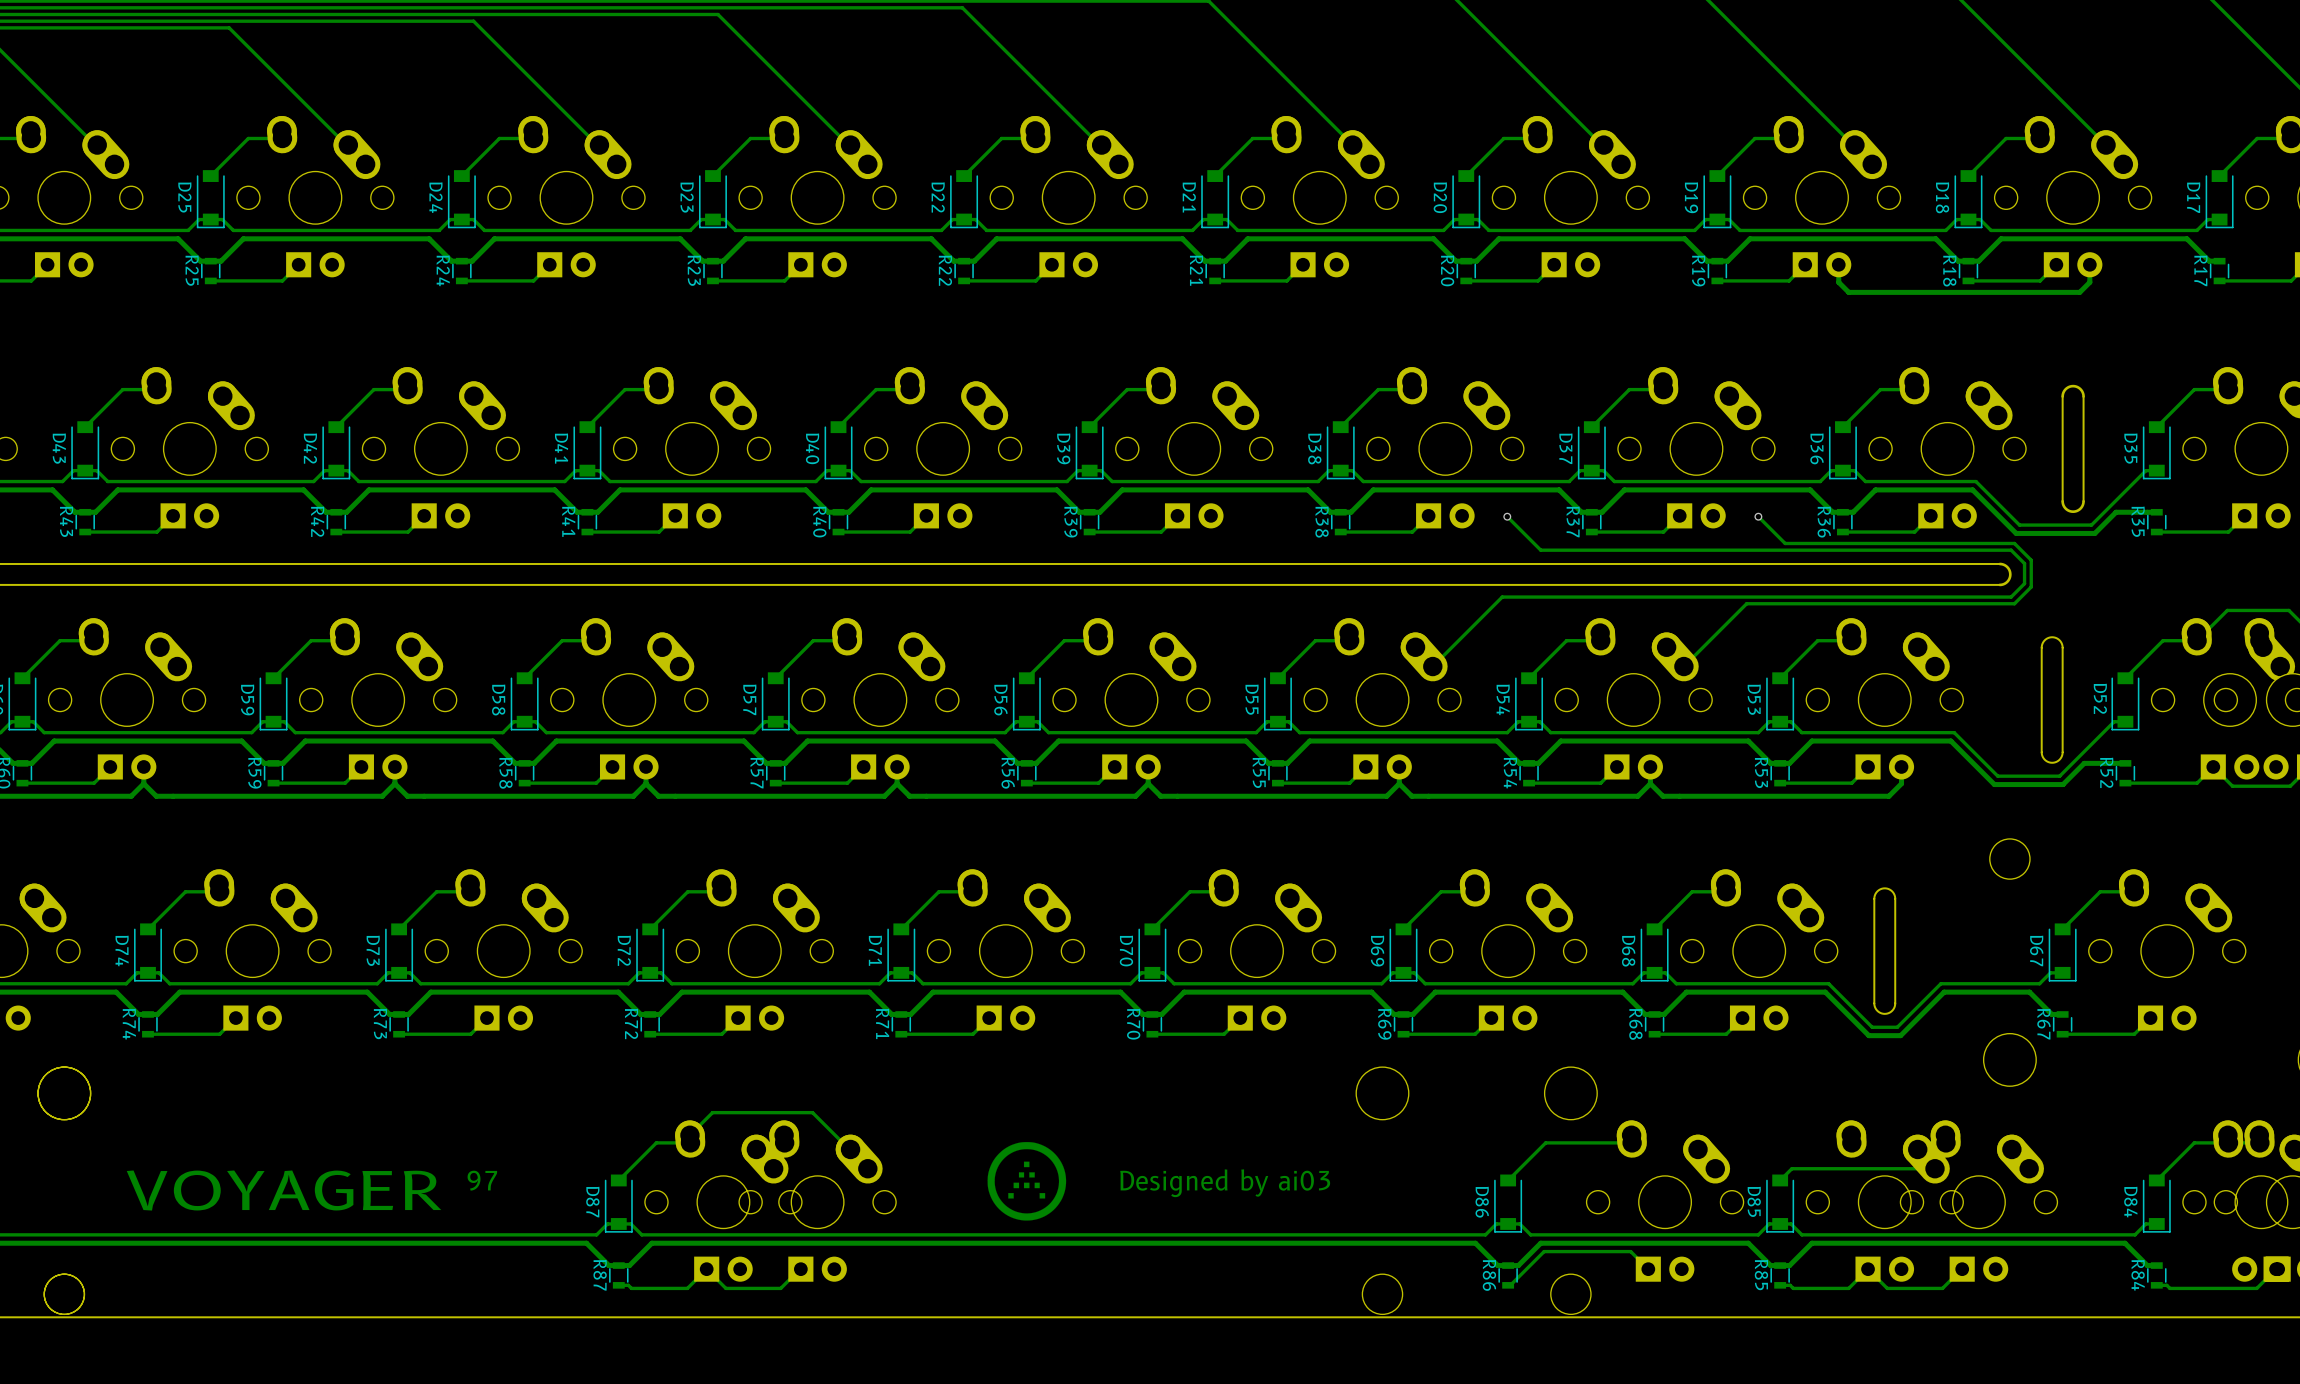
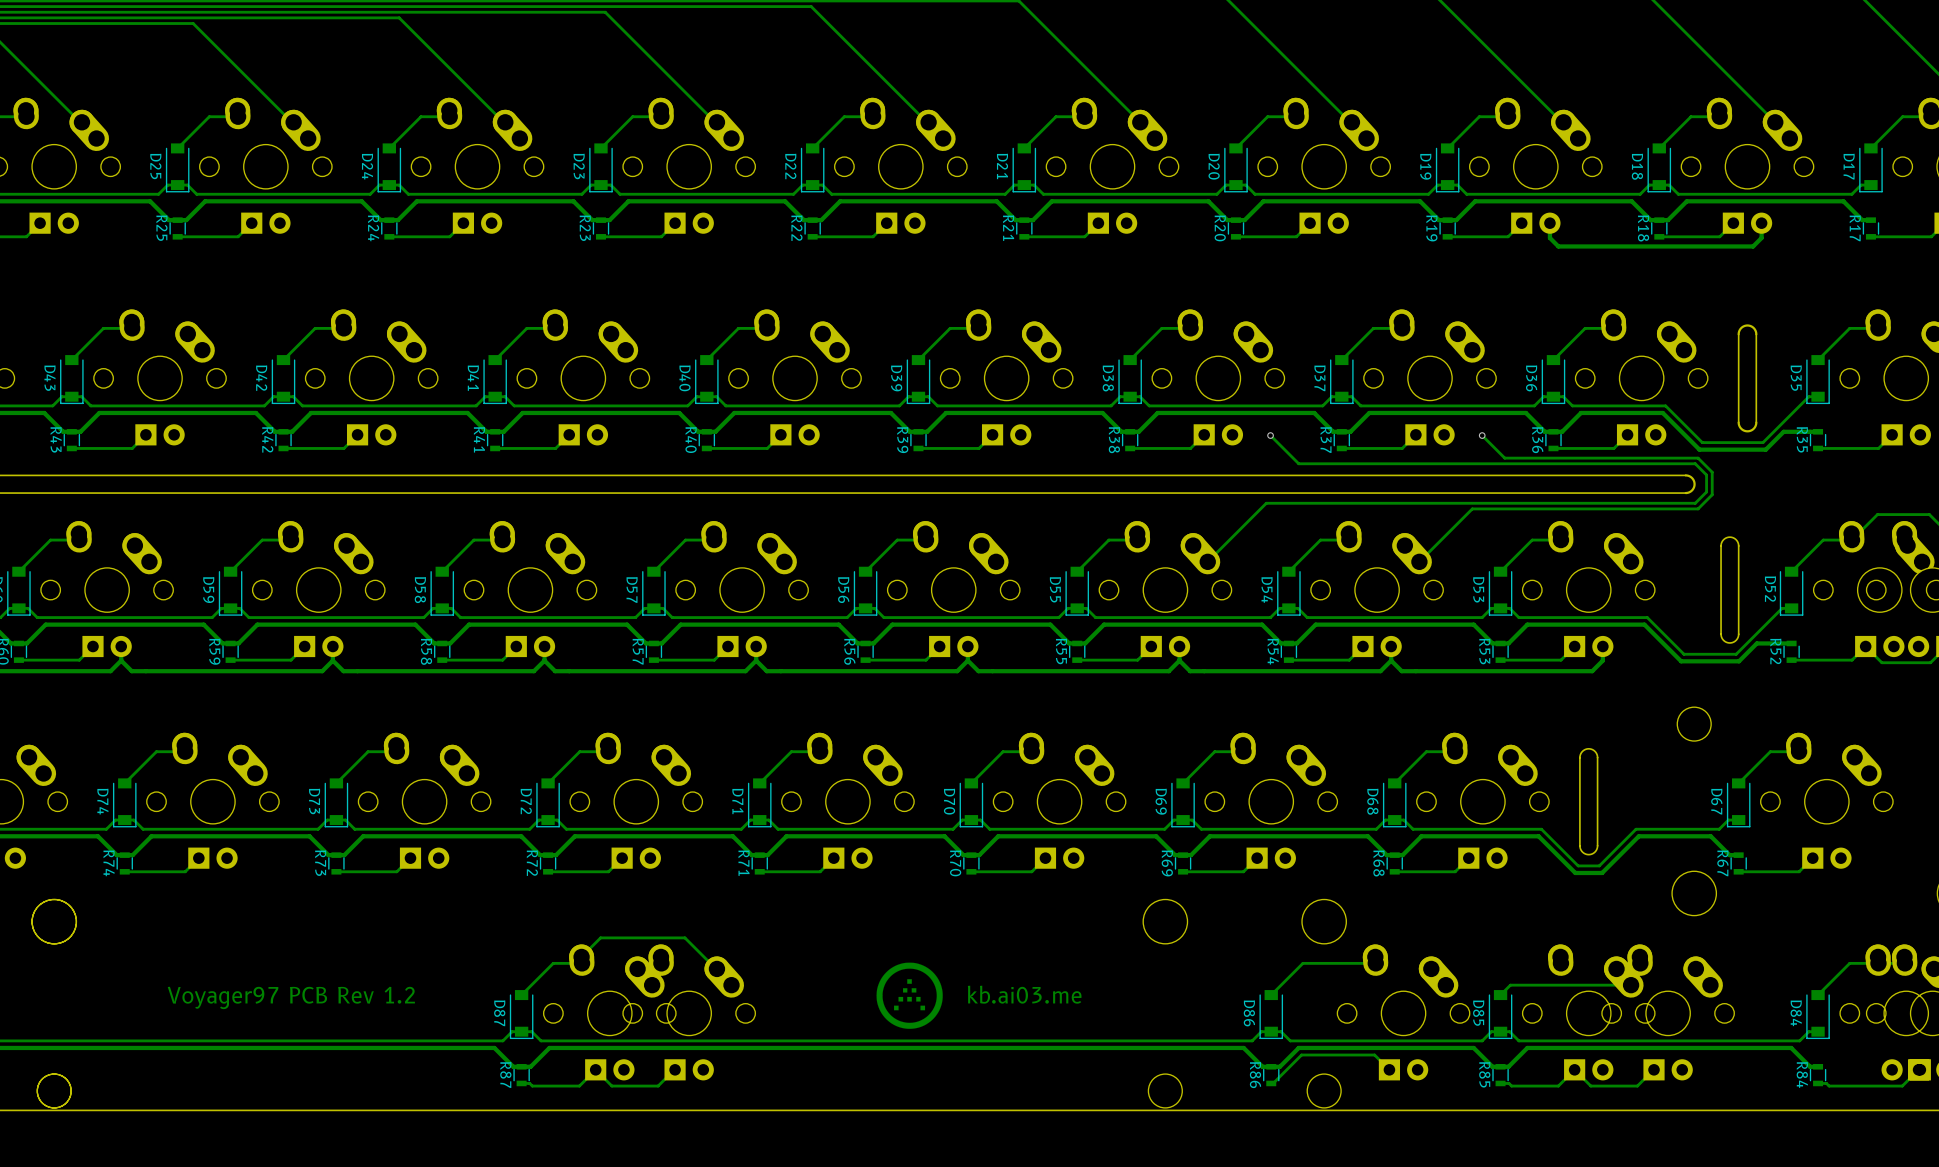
text: 97 (482, 1180) -> none
drawing position: (1026, 1181) -> (909, 995)
text: none -> Voyager97 PCB Rev 1.2 (291, 997)
text: Designed by ai03 (1225, 1183) -> kb.ai03.me (1024, 994)
text: VOYAGER (284, 1190) -> none

